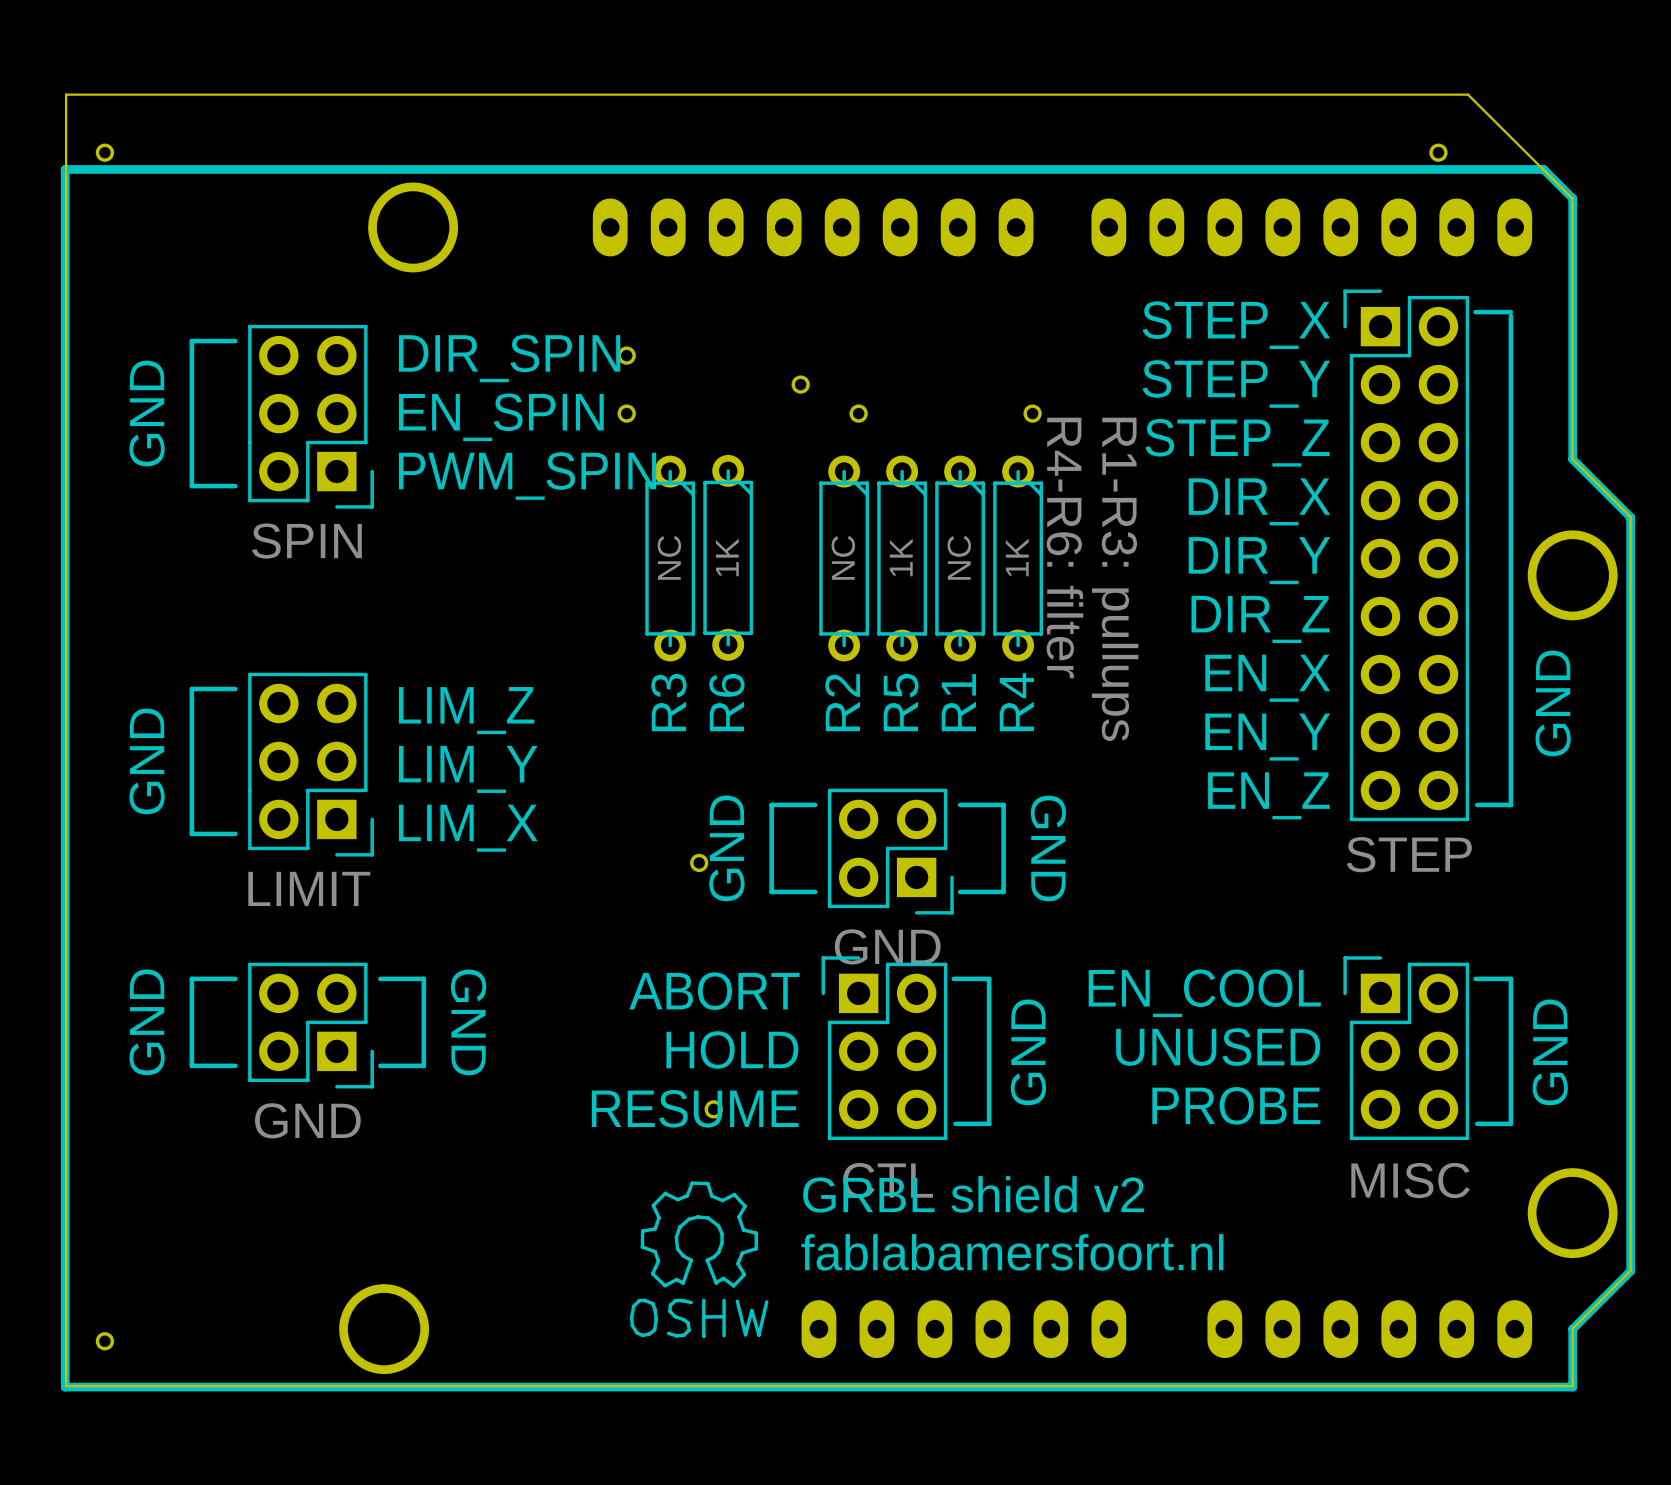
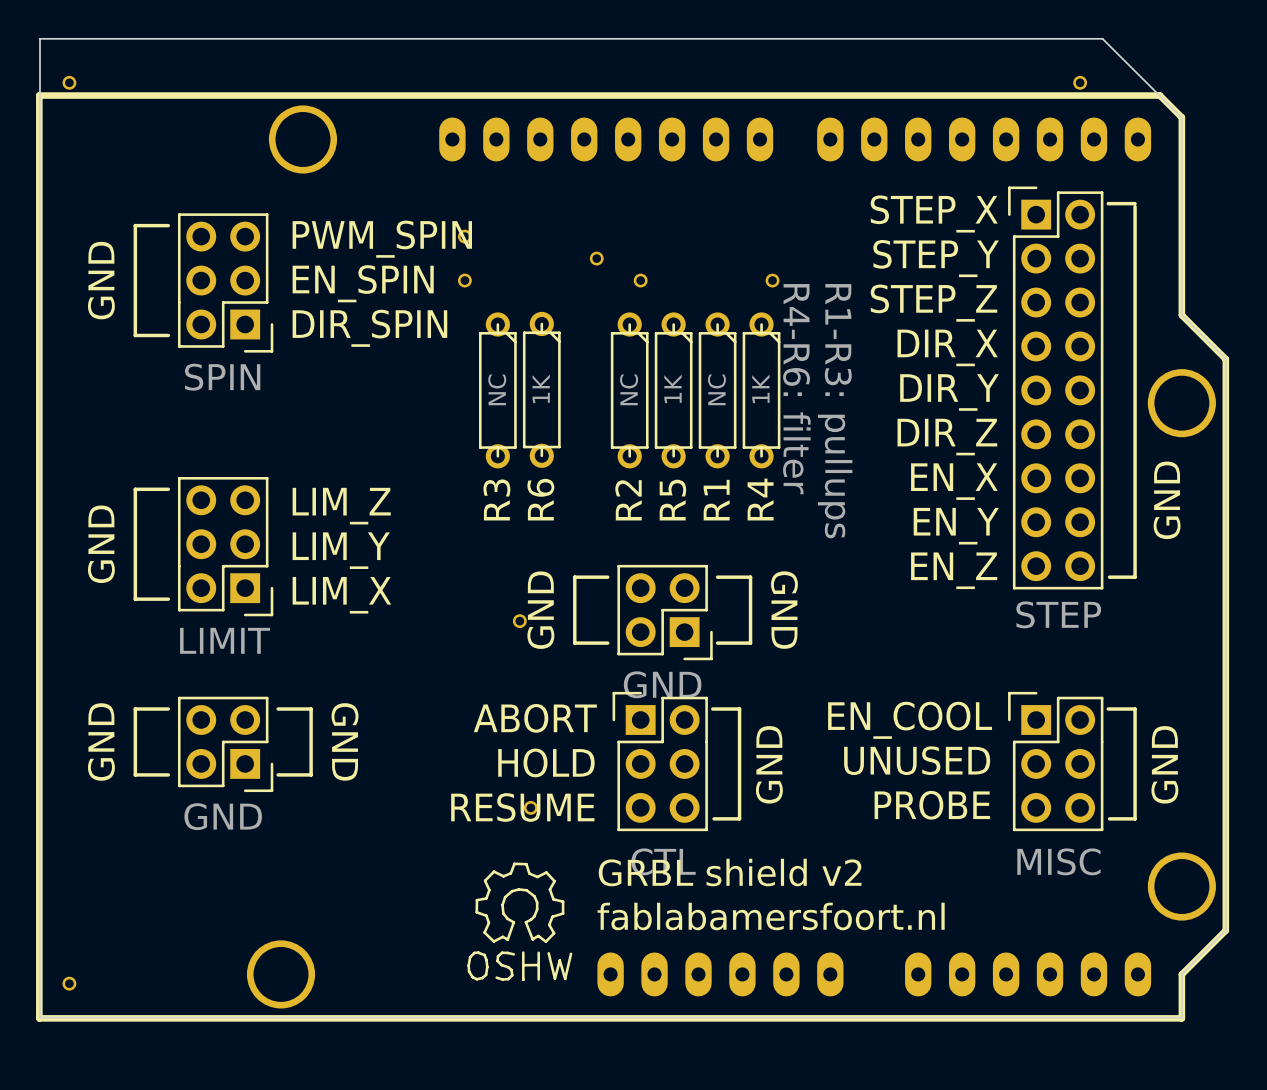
text: DIR_SPIN (509, 358) -> PWM_SPIN (382, 239)
text: PWM_SPIN (527, 476) -> DIR_SPIN (369, 328)

